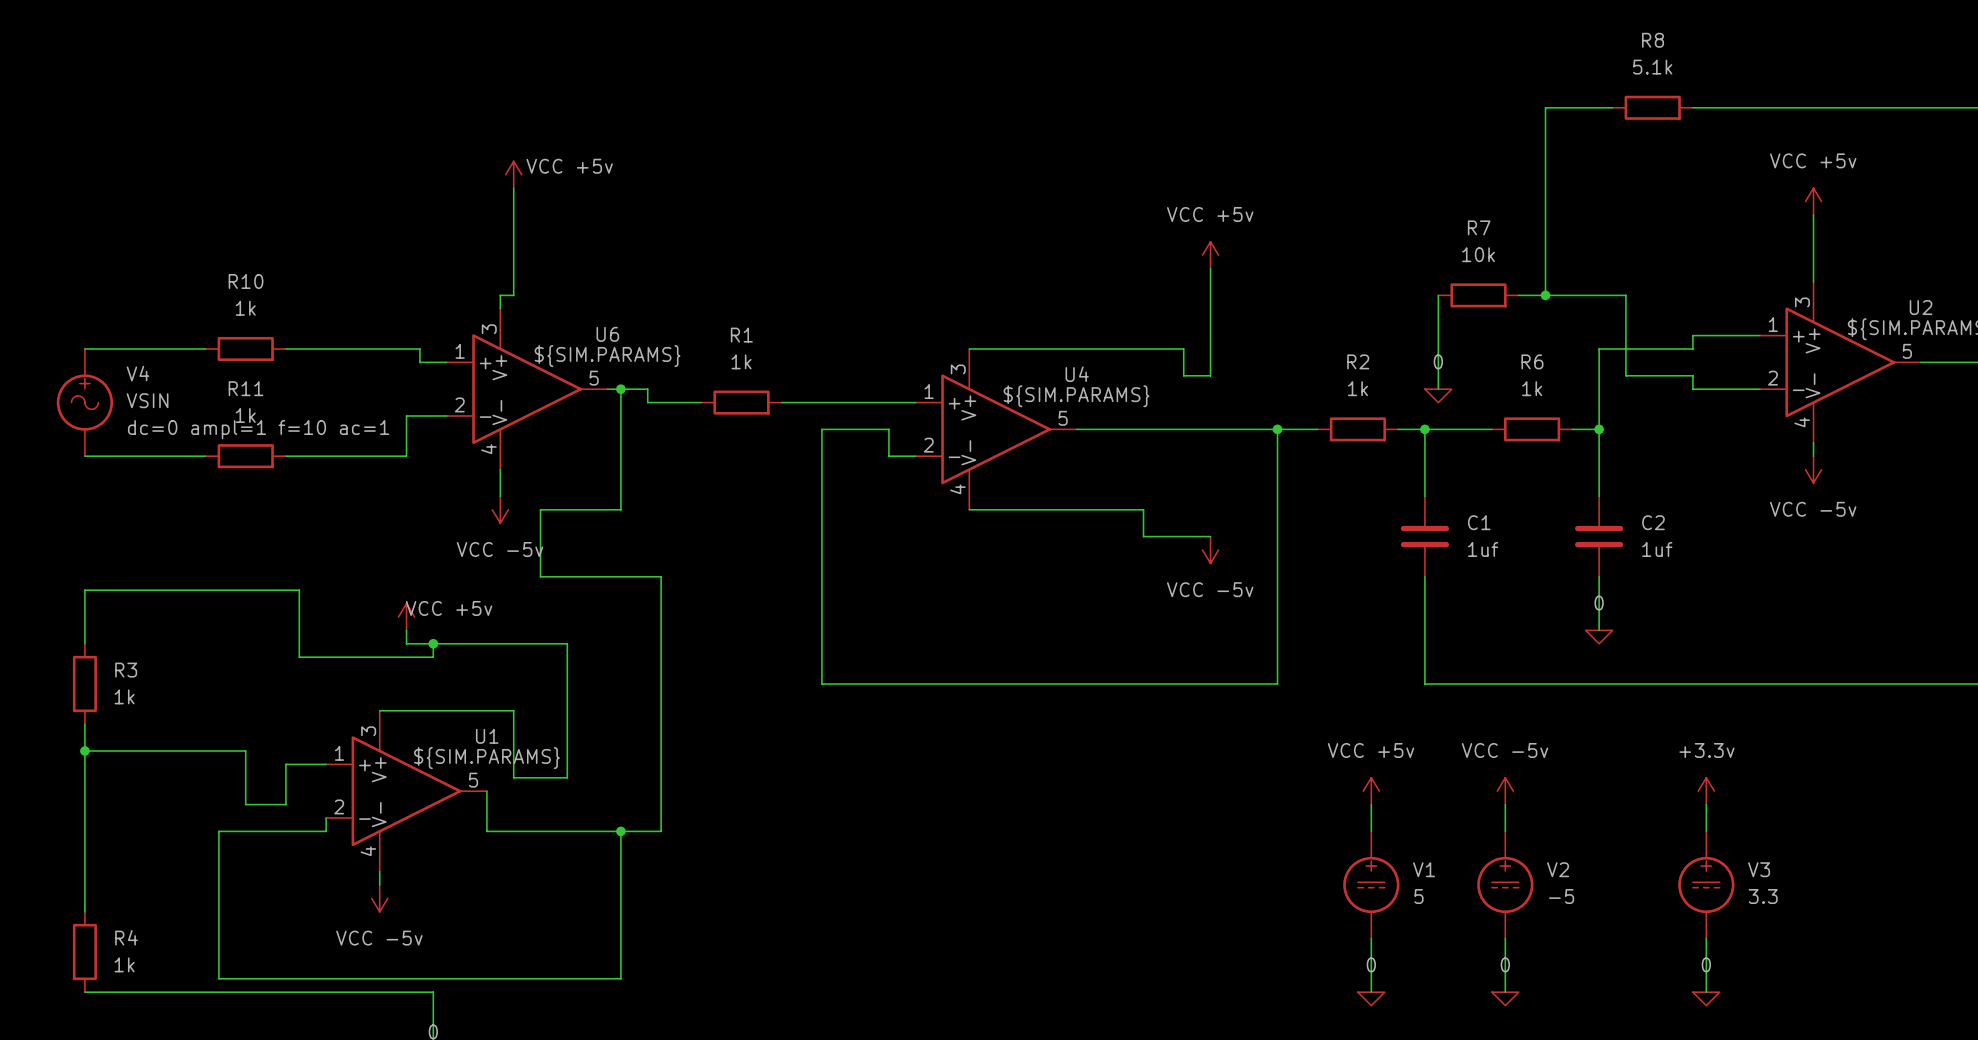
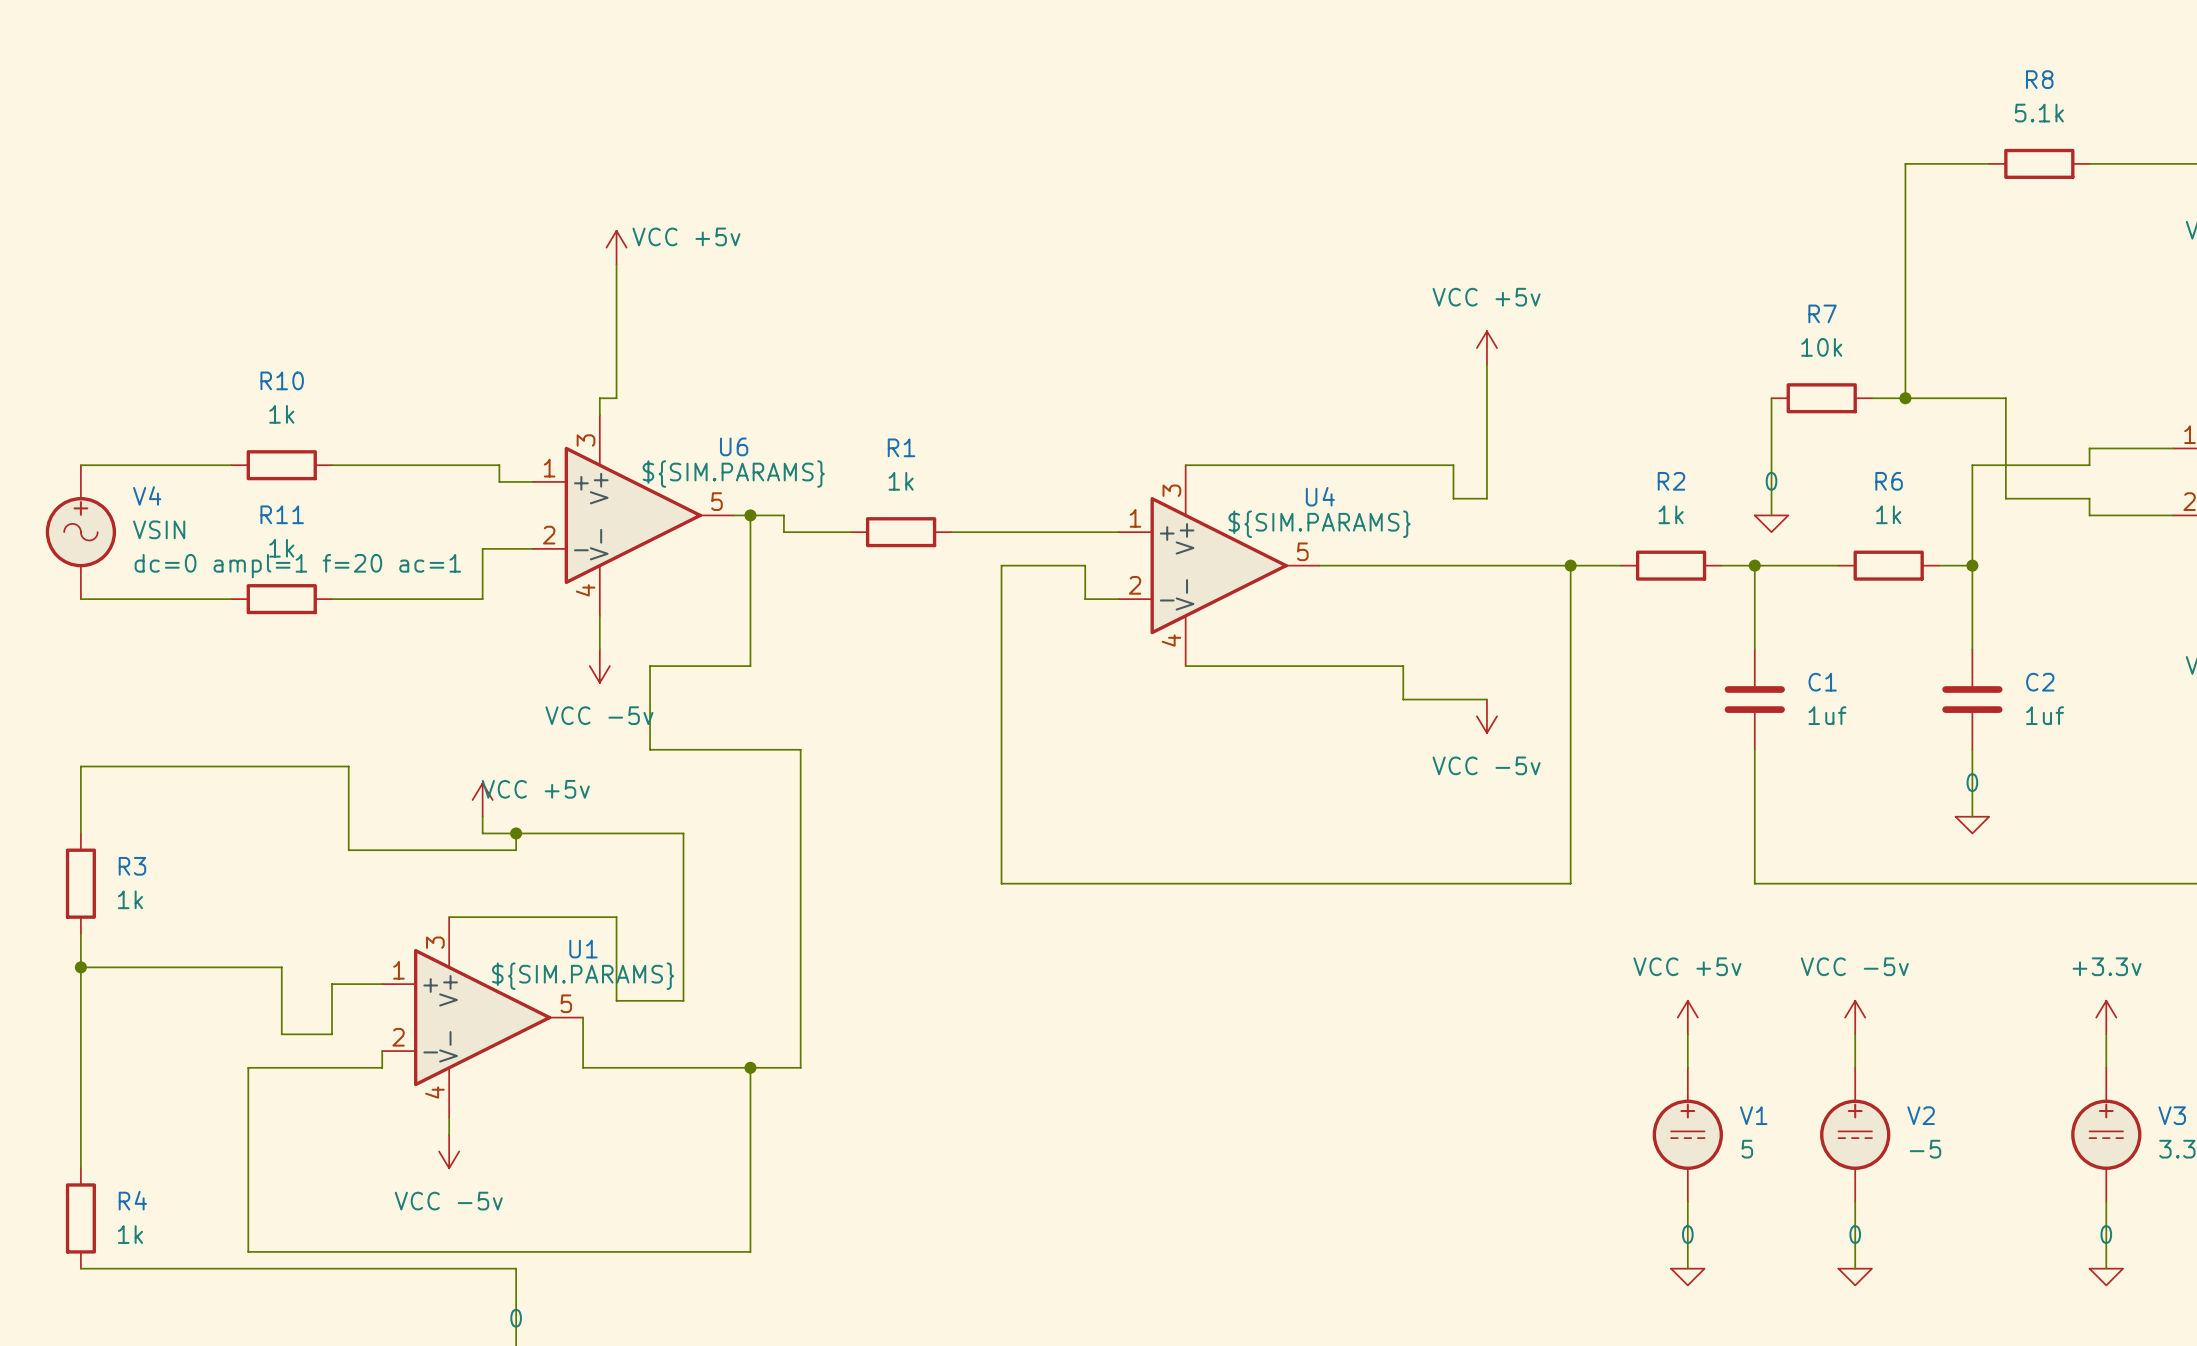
V4 text: dc=0 ampl=1 f=10 ac=1 (258, 429) -> dc=0 ampl=1 f=20 ac=1 (297, 566)

